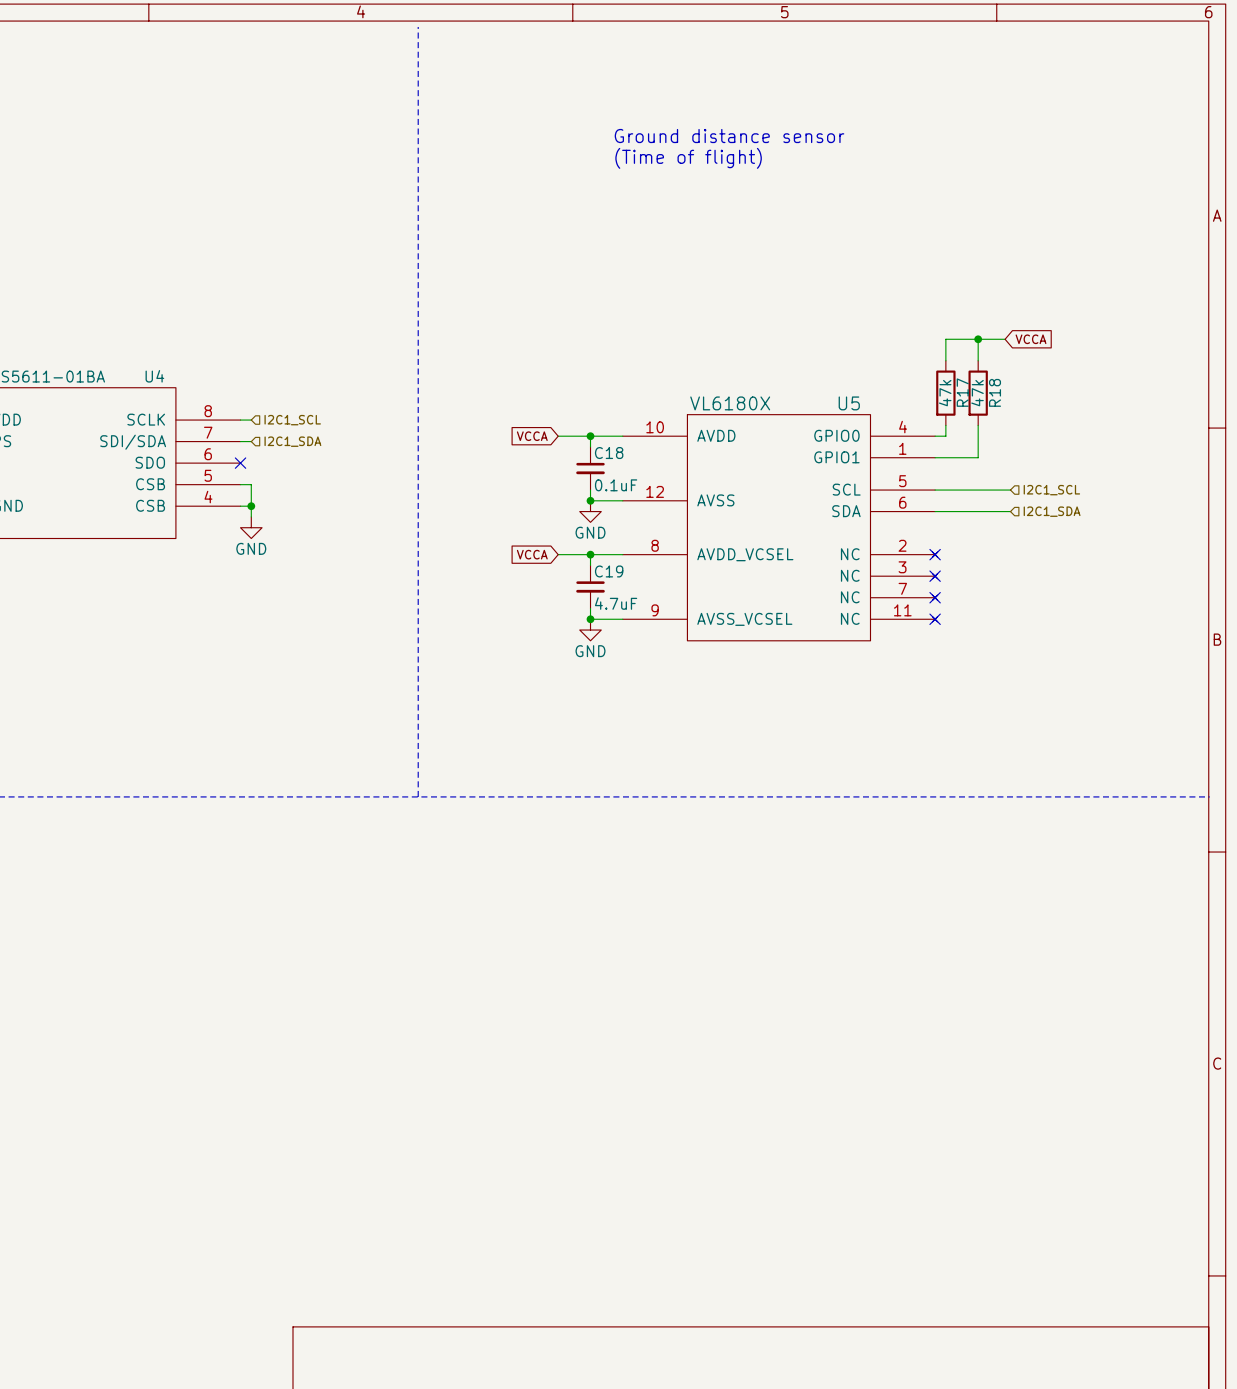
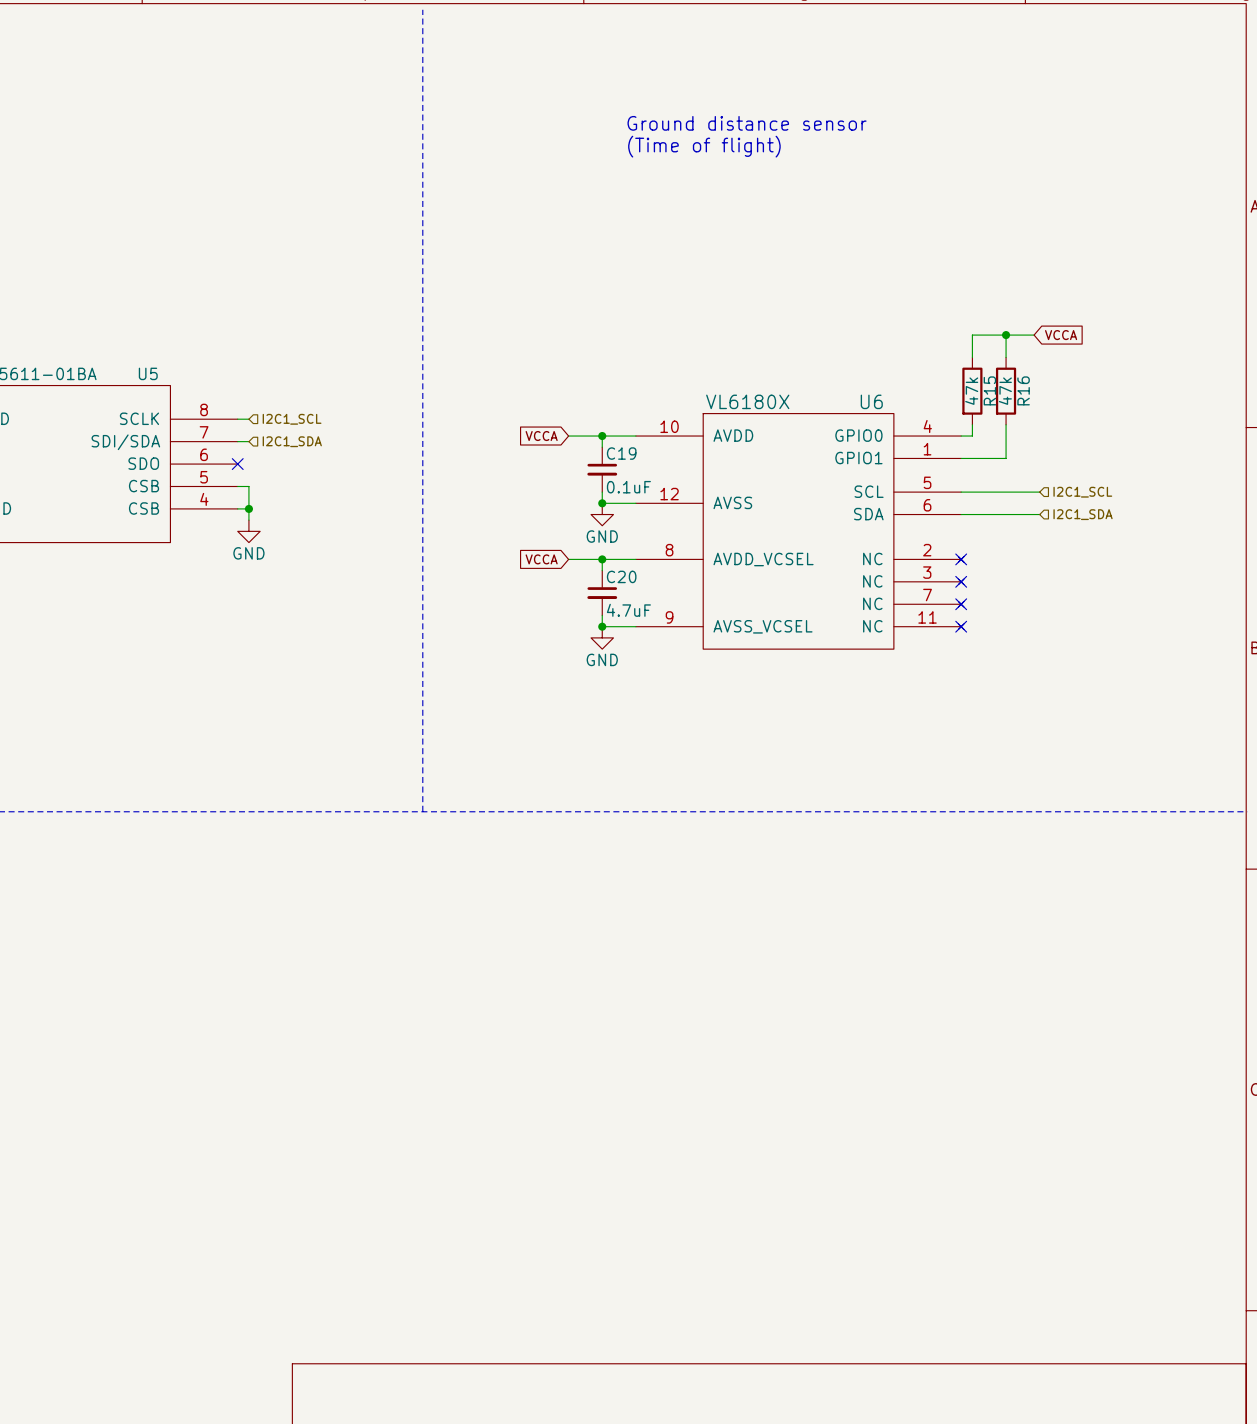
U4 name: U4 (154, 376) -> U5 (148, 373)
R17 name: R17 (962, 392) -> R15 (989, 390)
R18 name: R18 (995, 392) -> R16 (1023, 390)
U5 name: U5 (849, 403) -> U6 (871, 401)
C18 name: C18 (609, 453) -> C19 (621, 453)
C19 name: C19 (609, 571) -> C20 (621, 576)

